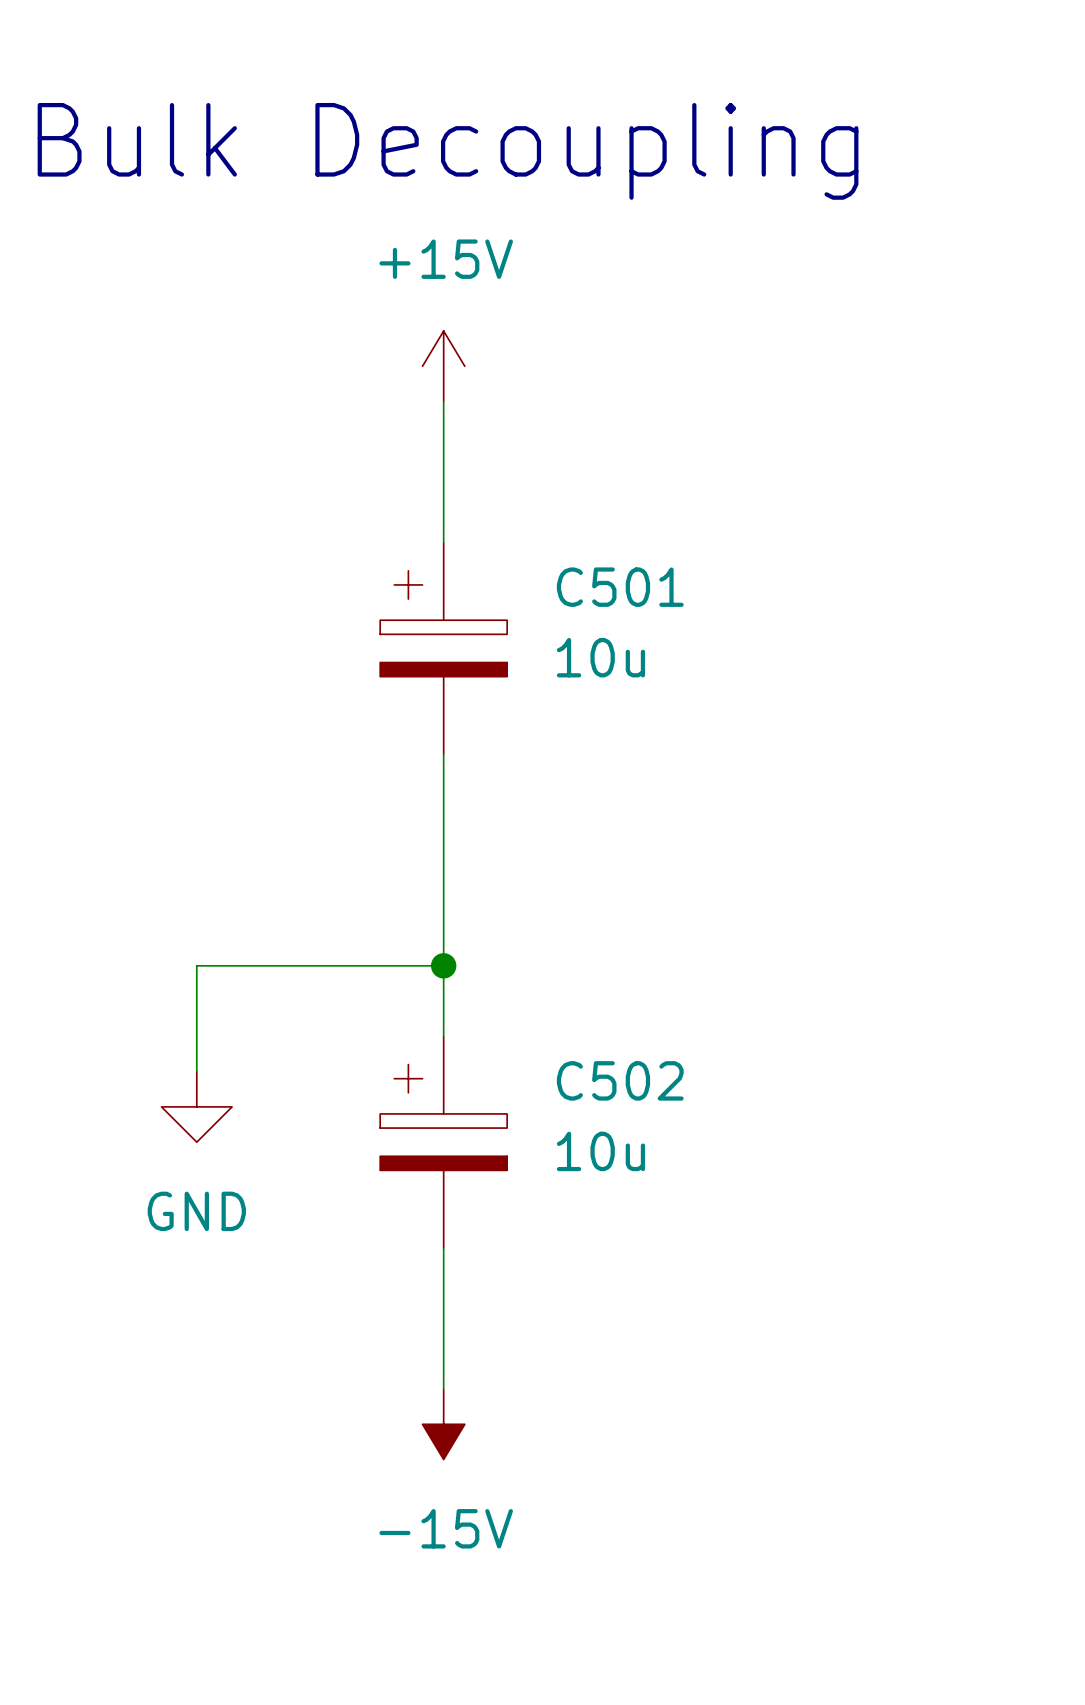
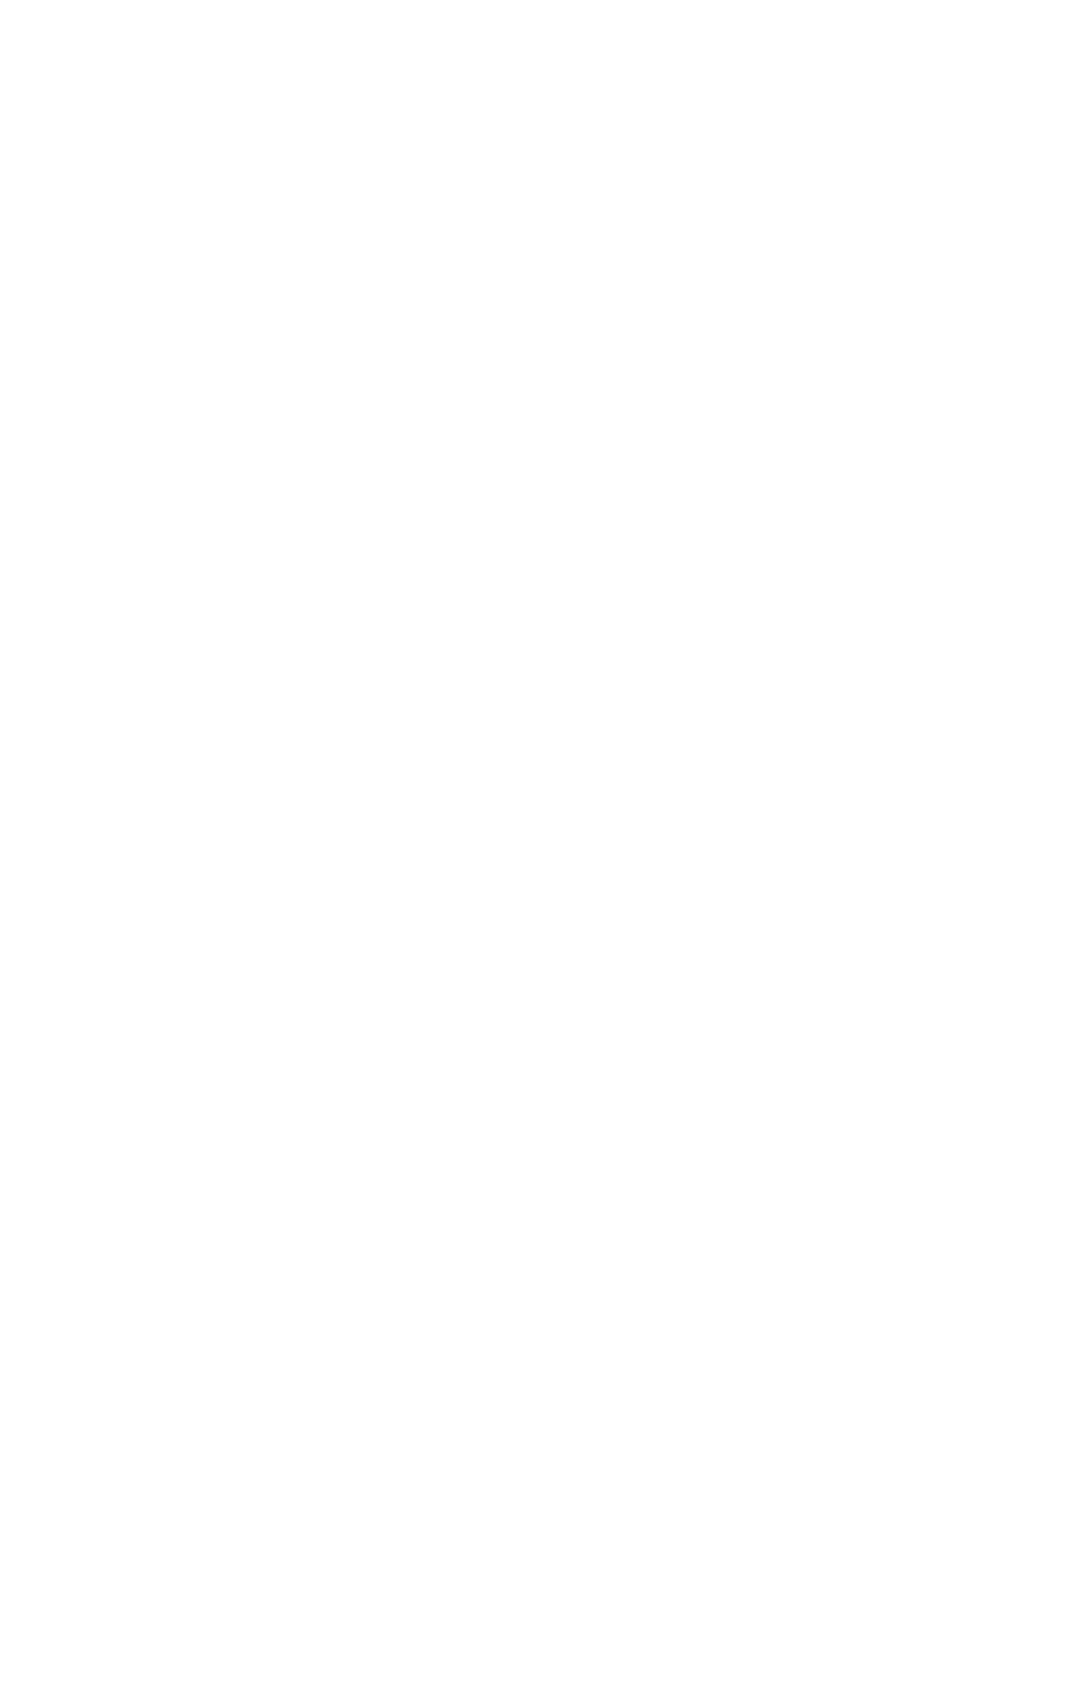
text: Bulk Decoupling (448, 151) -> none
power symbol: +15V (443, 366) -> none
wire: (443, 401) (443, 542) -> none
C501: 10u (443, 648) -> none
wire: (443, 754) (443, 1036) -> none
wire: (443, 965) (196, 965) (196, 1071) -> none
junction: (443, 965) -> none
power symbol: GND (196, 1106) -> none
C502: 10u (443, 1142) -> none
wire: (443, 1247) (443, 1389) -> none
power symbol: -15V (443, 1424) -> none

